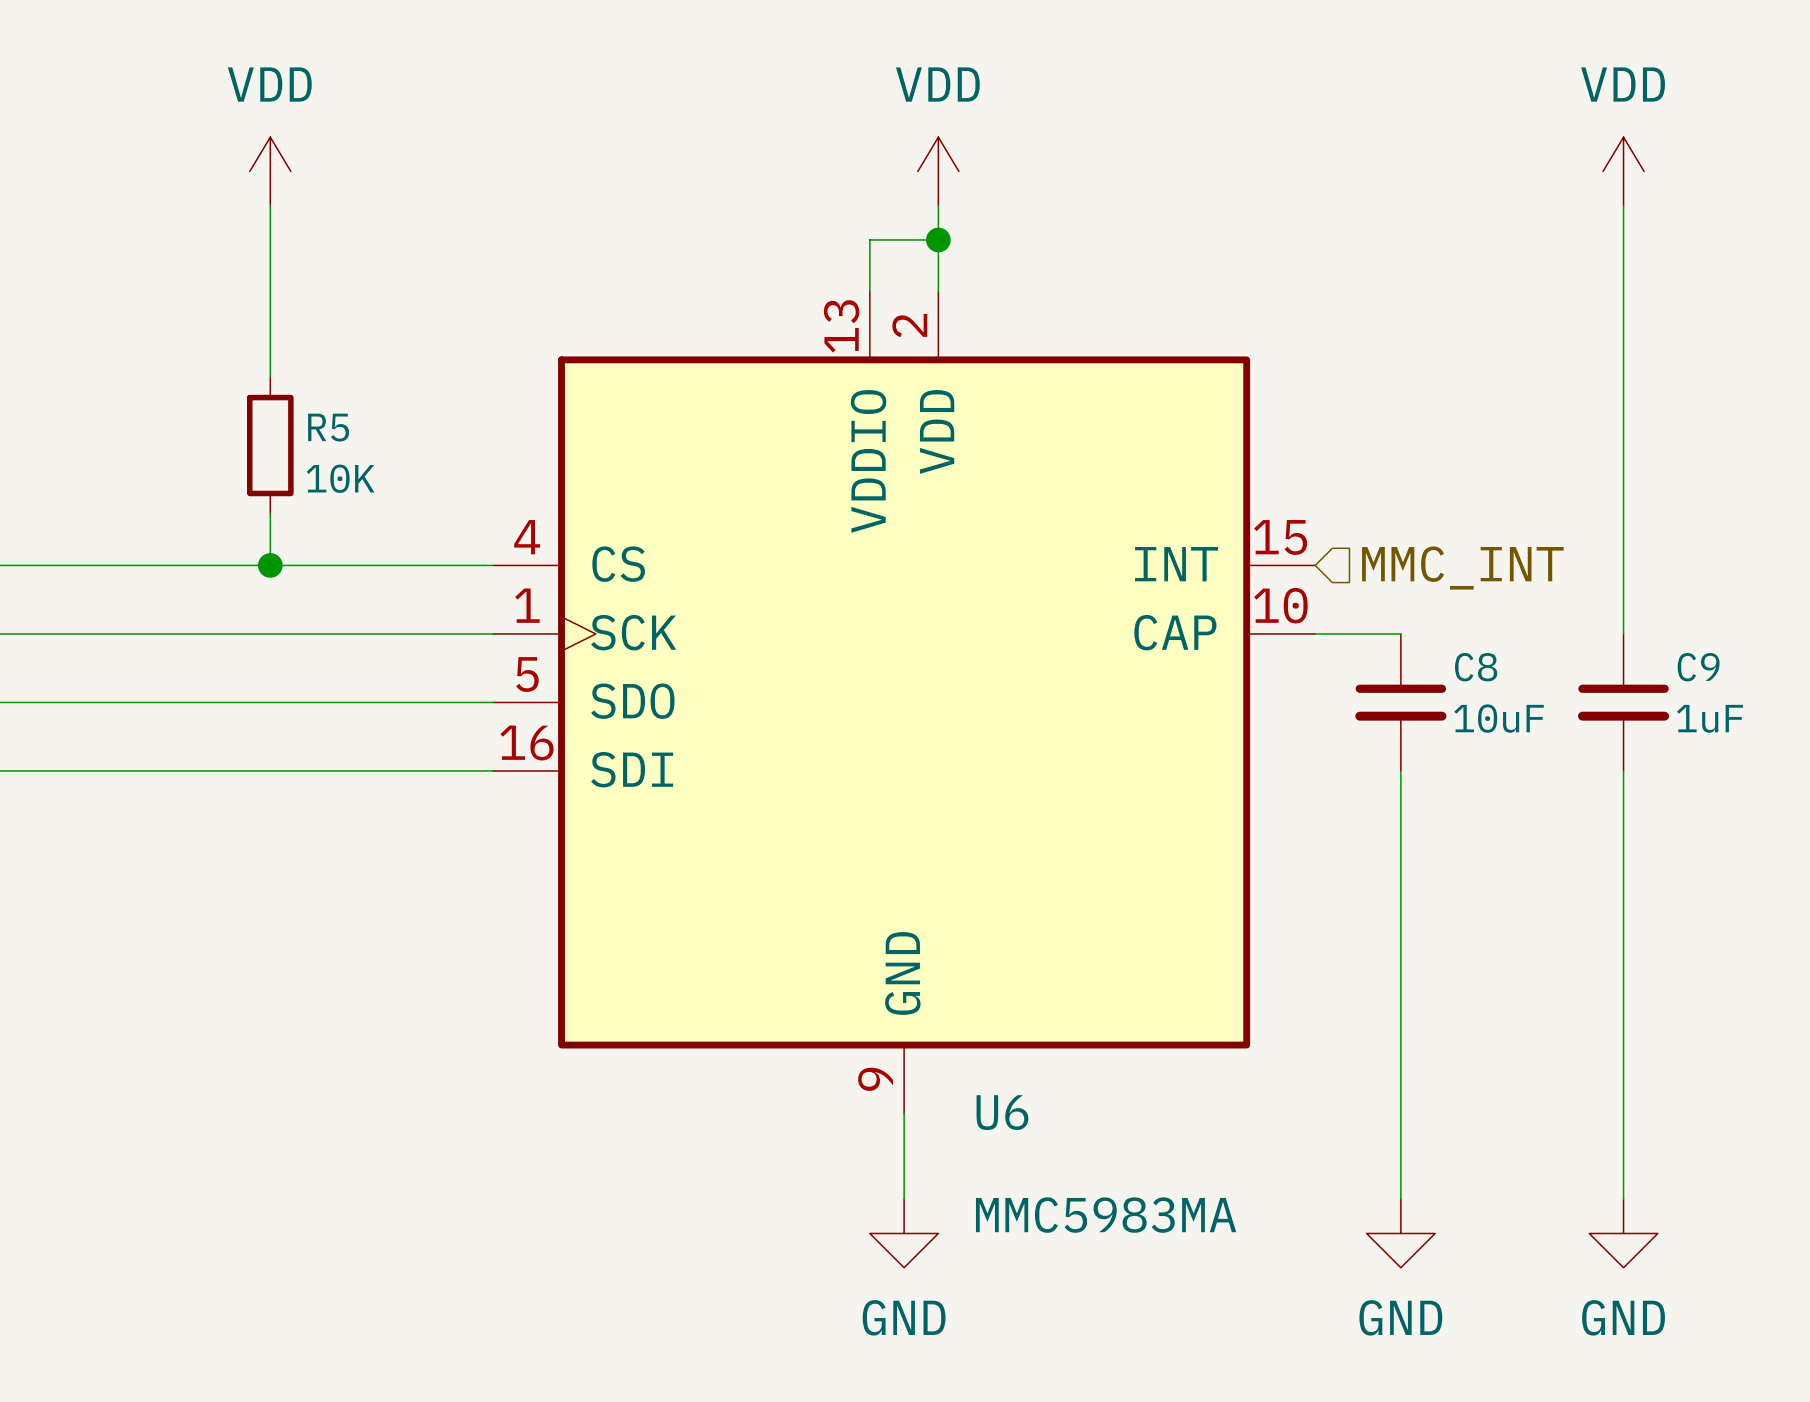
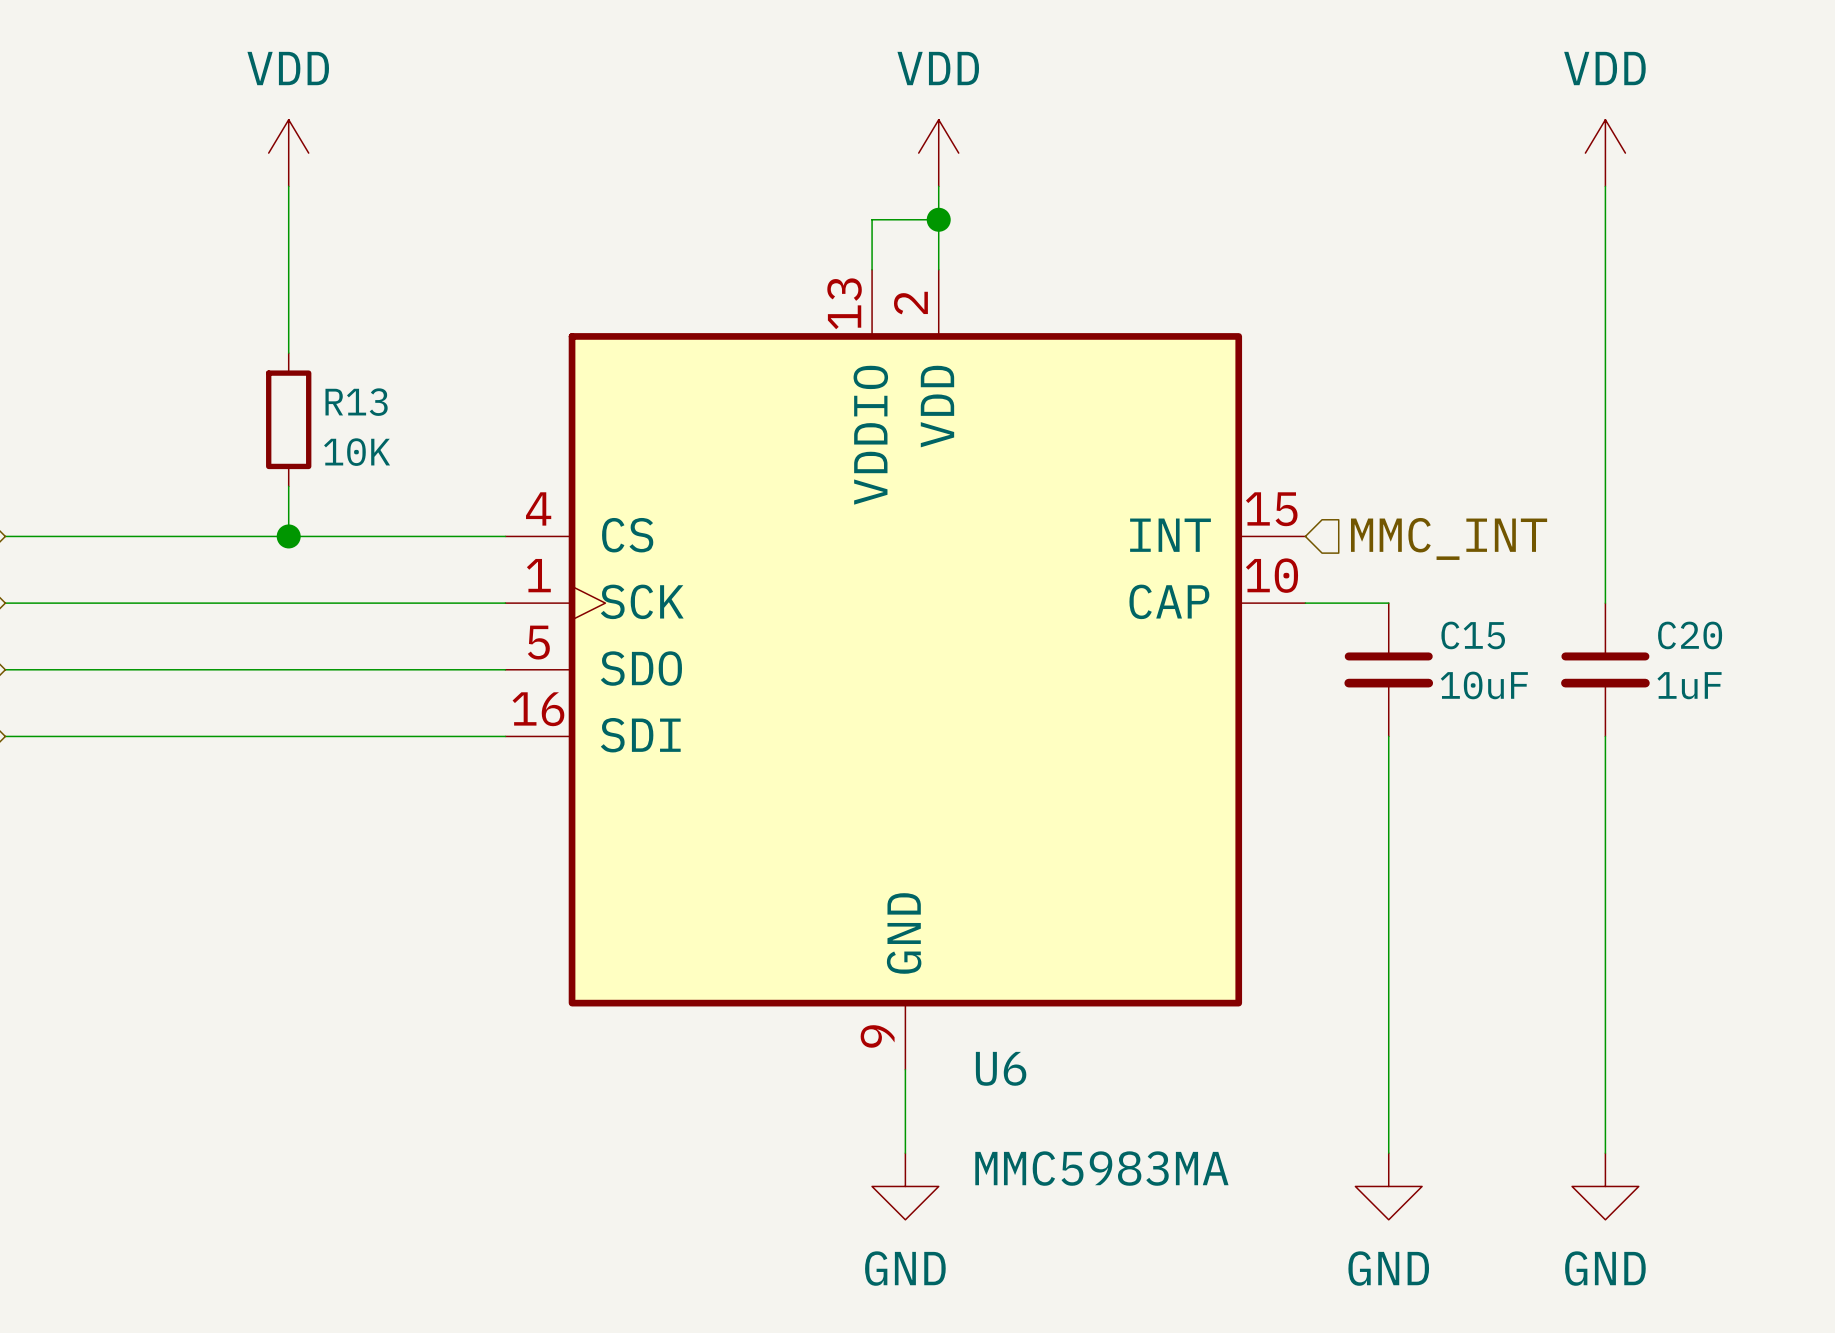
R5 name: R5 (328, 427) -> R13 (356, 402)
C8 name: C8 (1476, 667) -> C15 (1473, 635)
C9 name: C9 (1698, 667) -> C20 (1690, 635)

